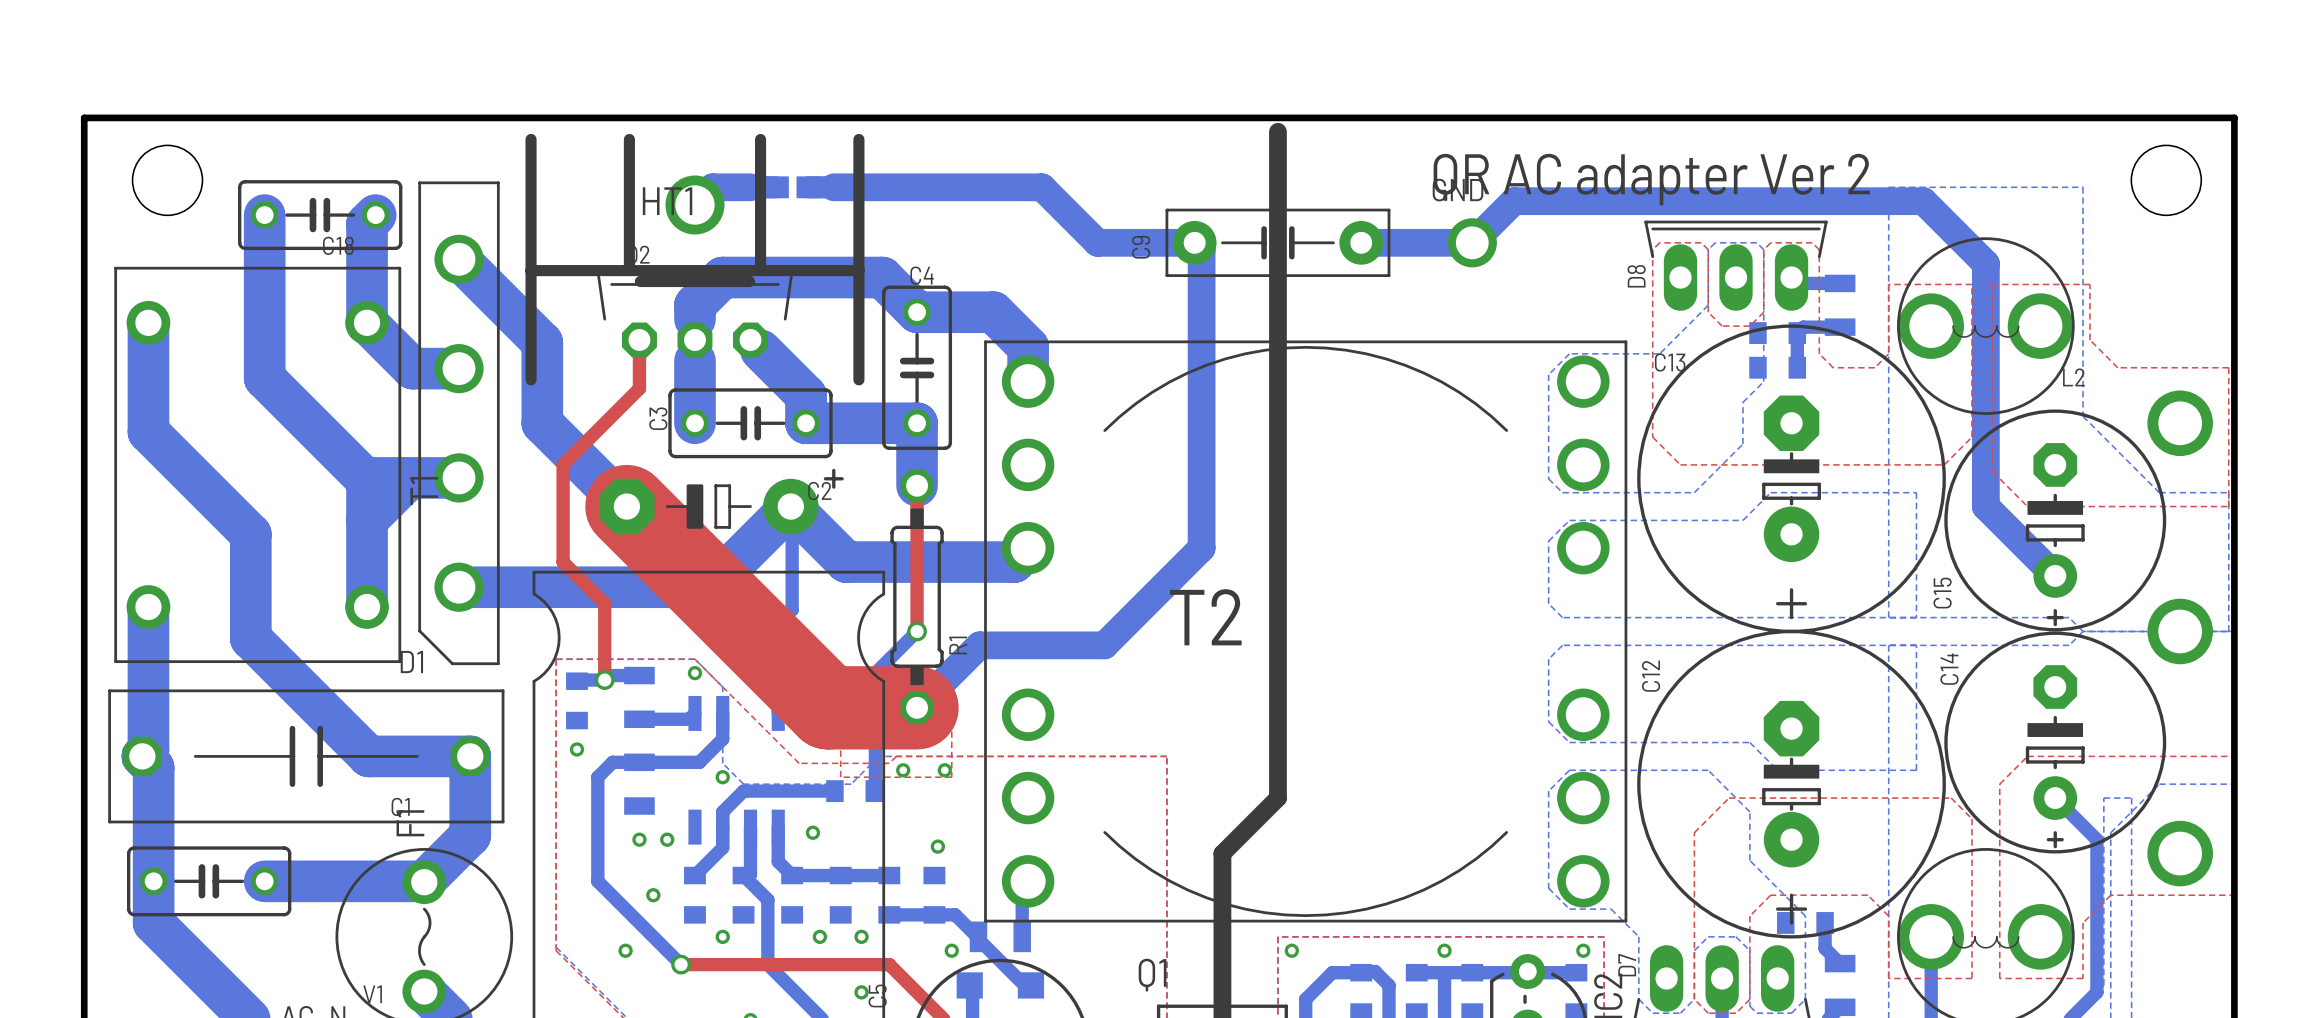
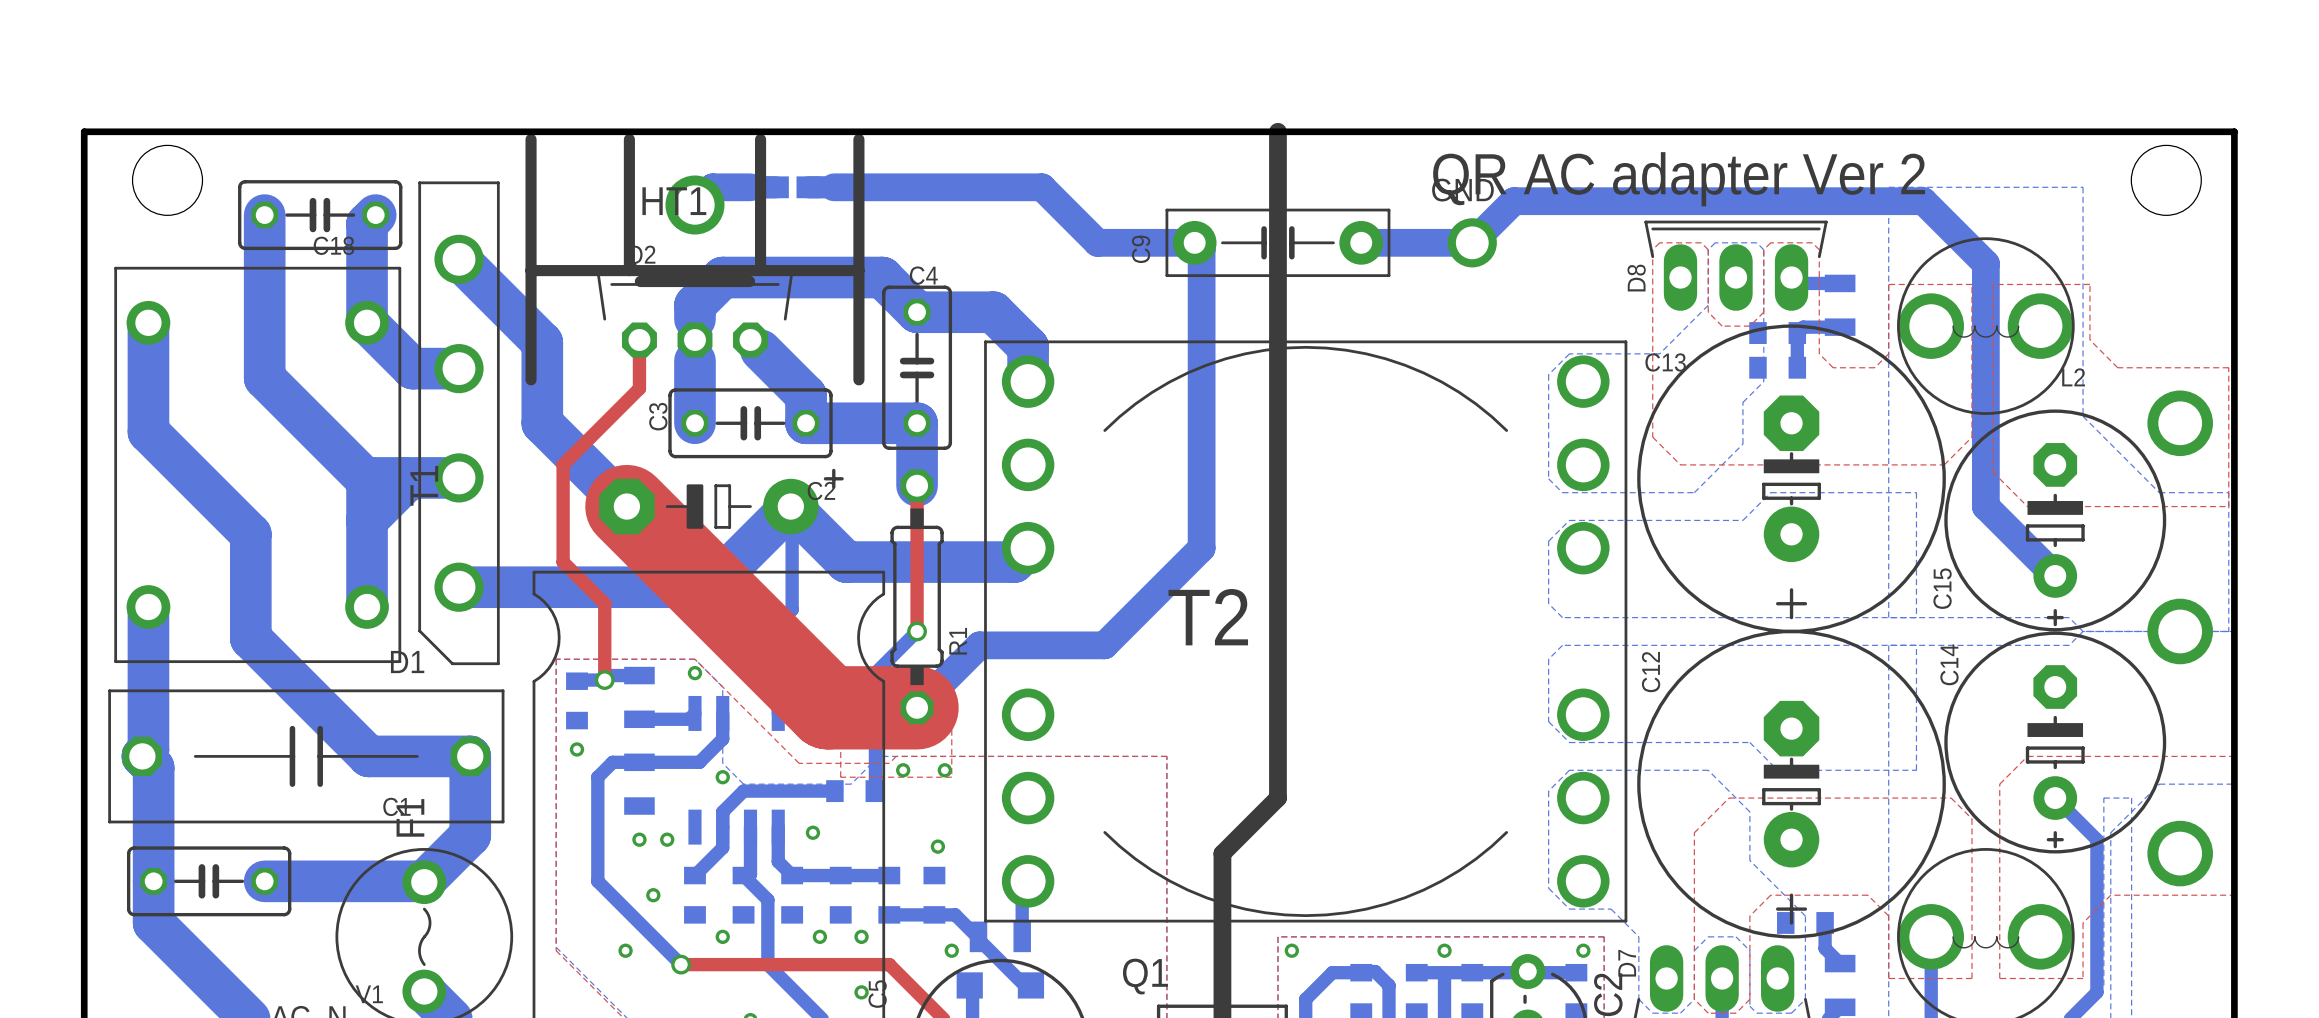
board edge: (84, 131) (84, 117) (2234, 117) (2234, 131) -> (84, 131) (2234, 131)

